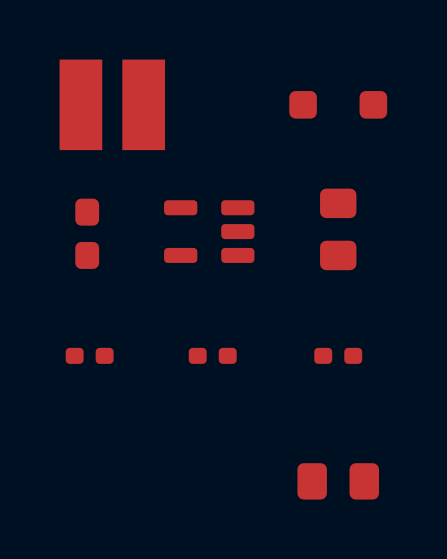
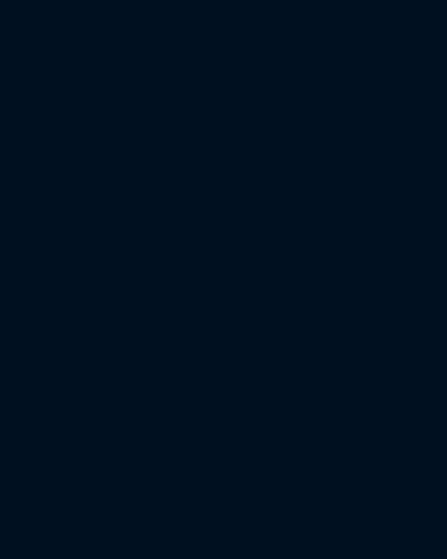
part: (112, 104) -> none
part: (338, 104) -> none
part: (338, 229) -> none
part: (209, 231) -> none
part: (87, 233) -> none
part: (89, 355) -> none
part: (212, 355) -> none
part: (338, 355) -> none
part: (338, 481) -> none

